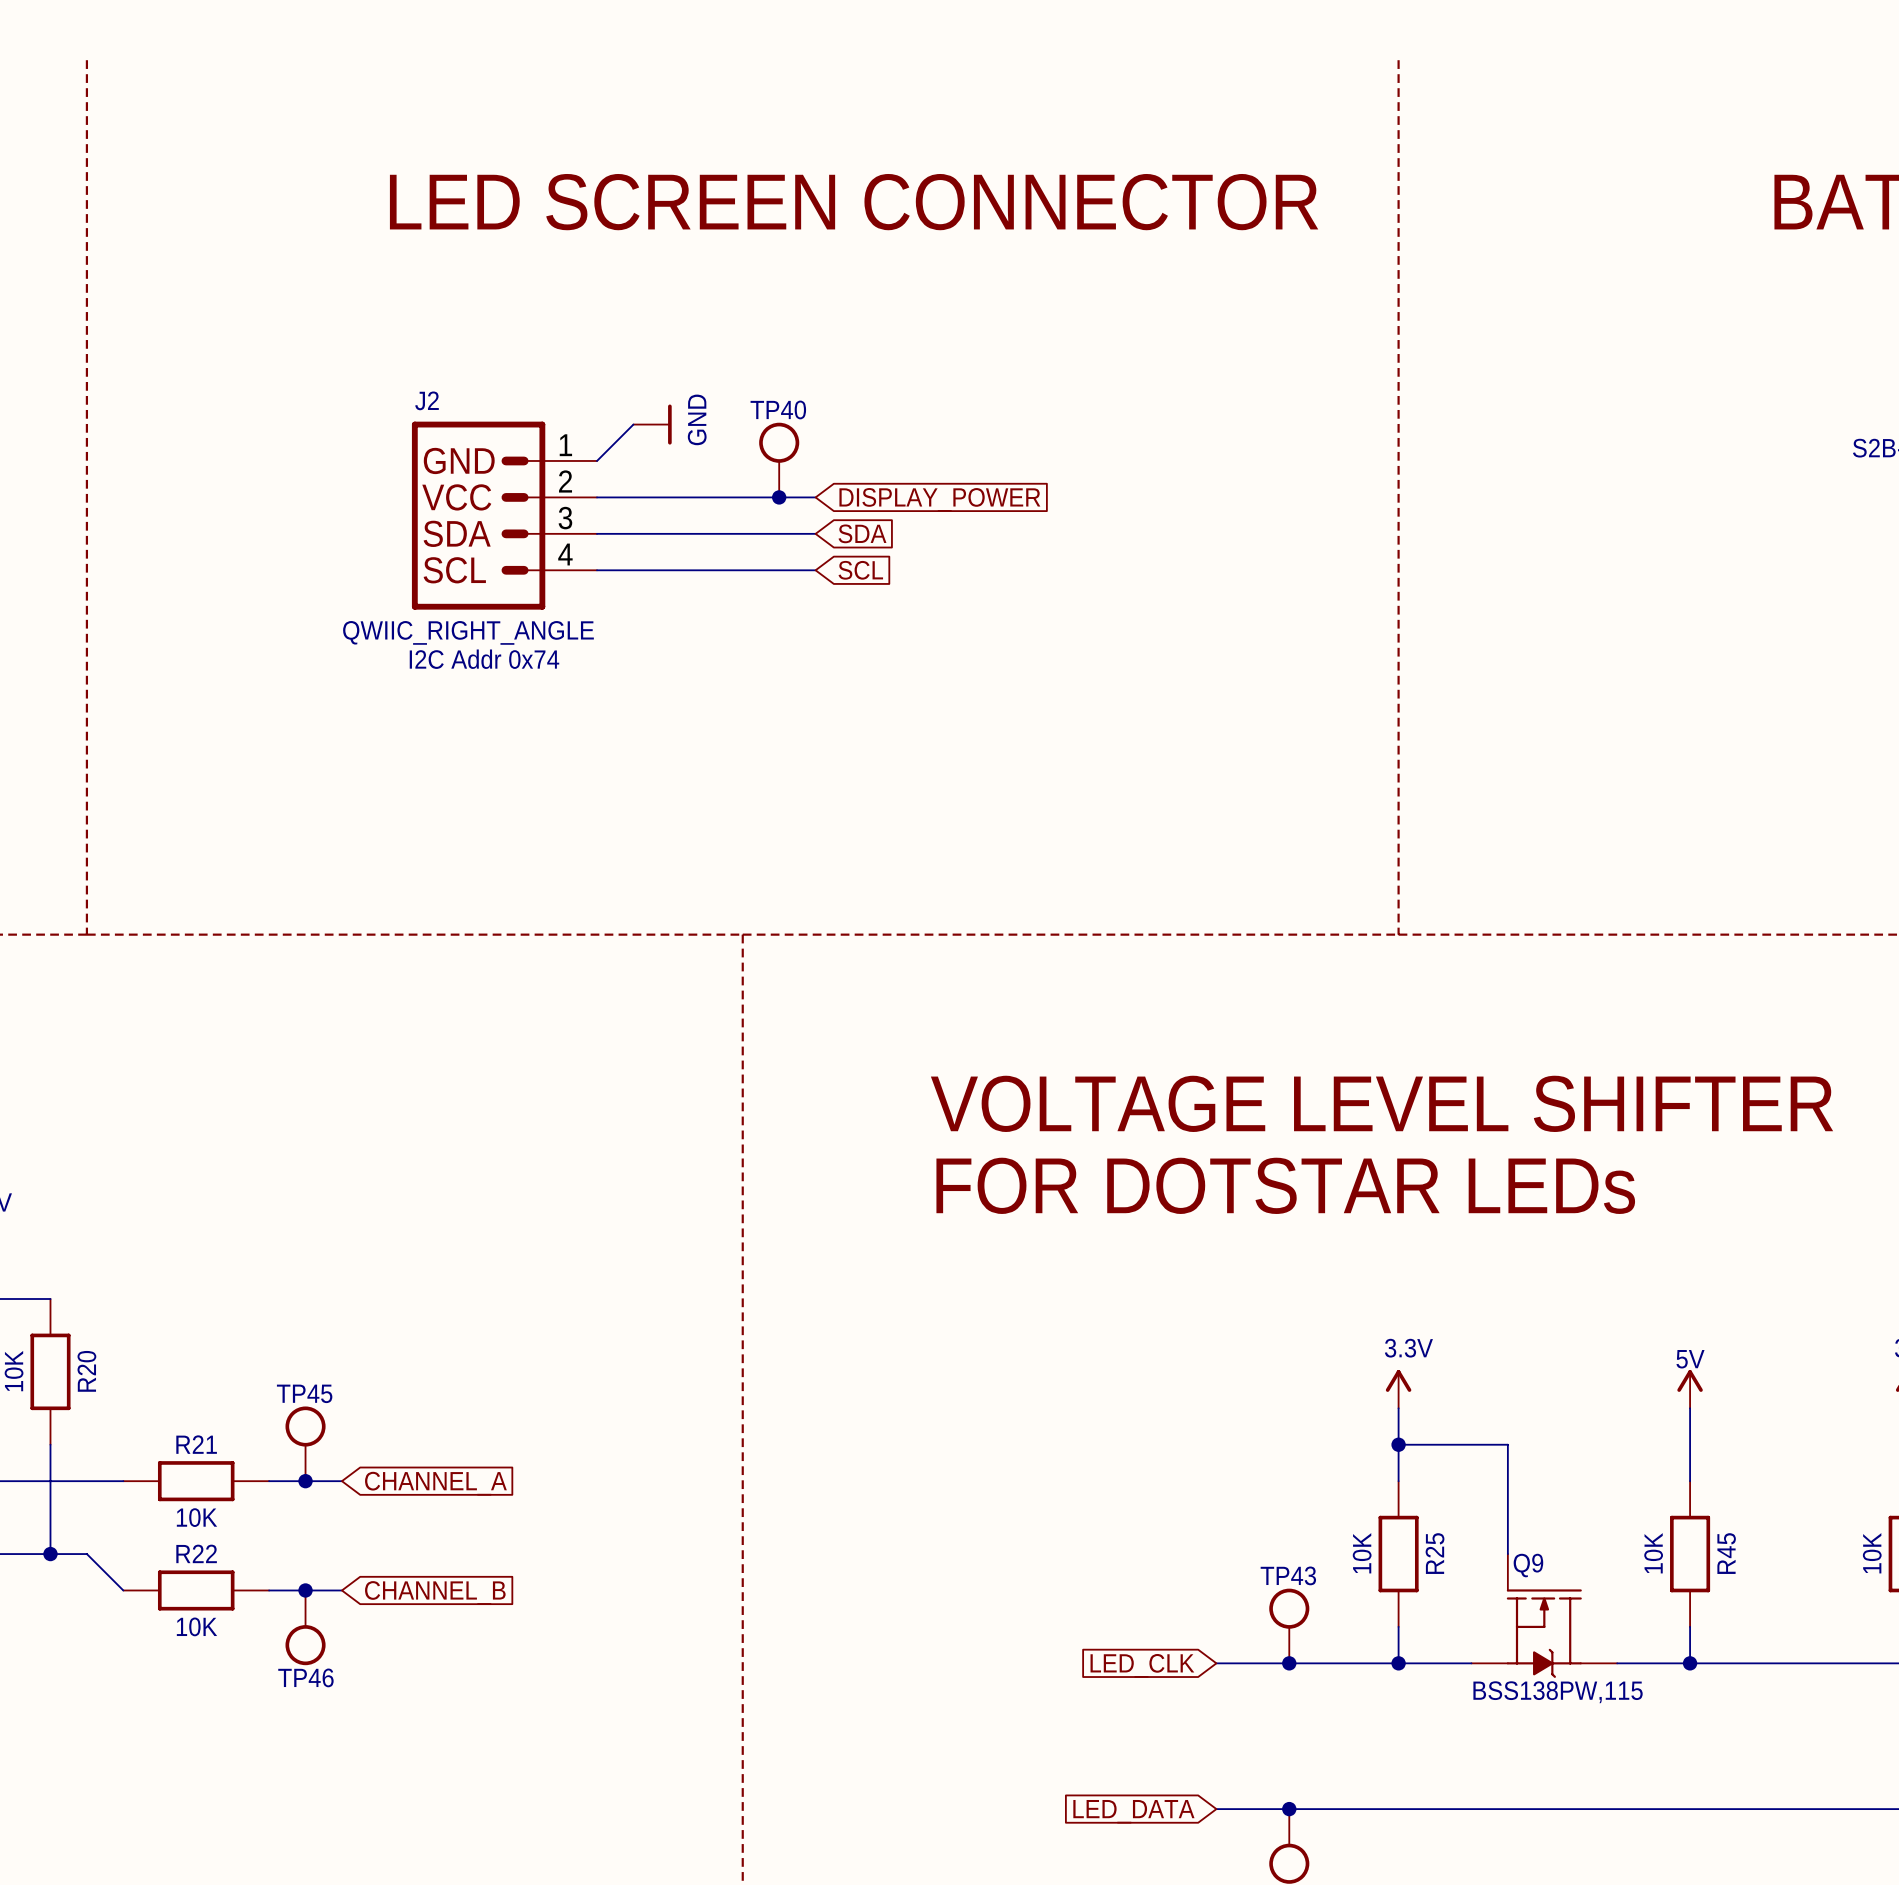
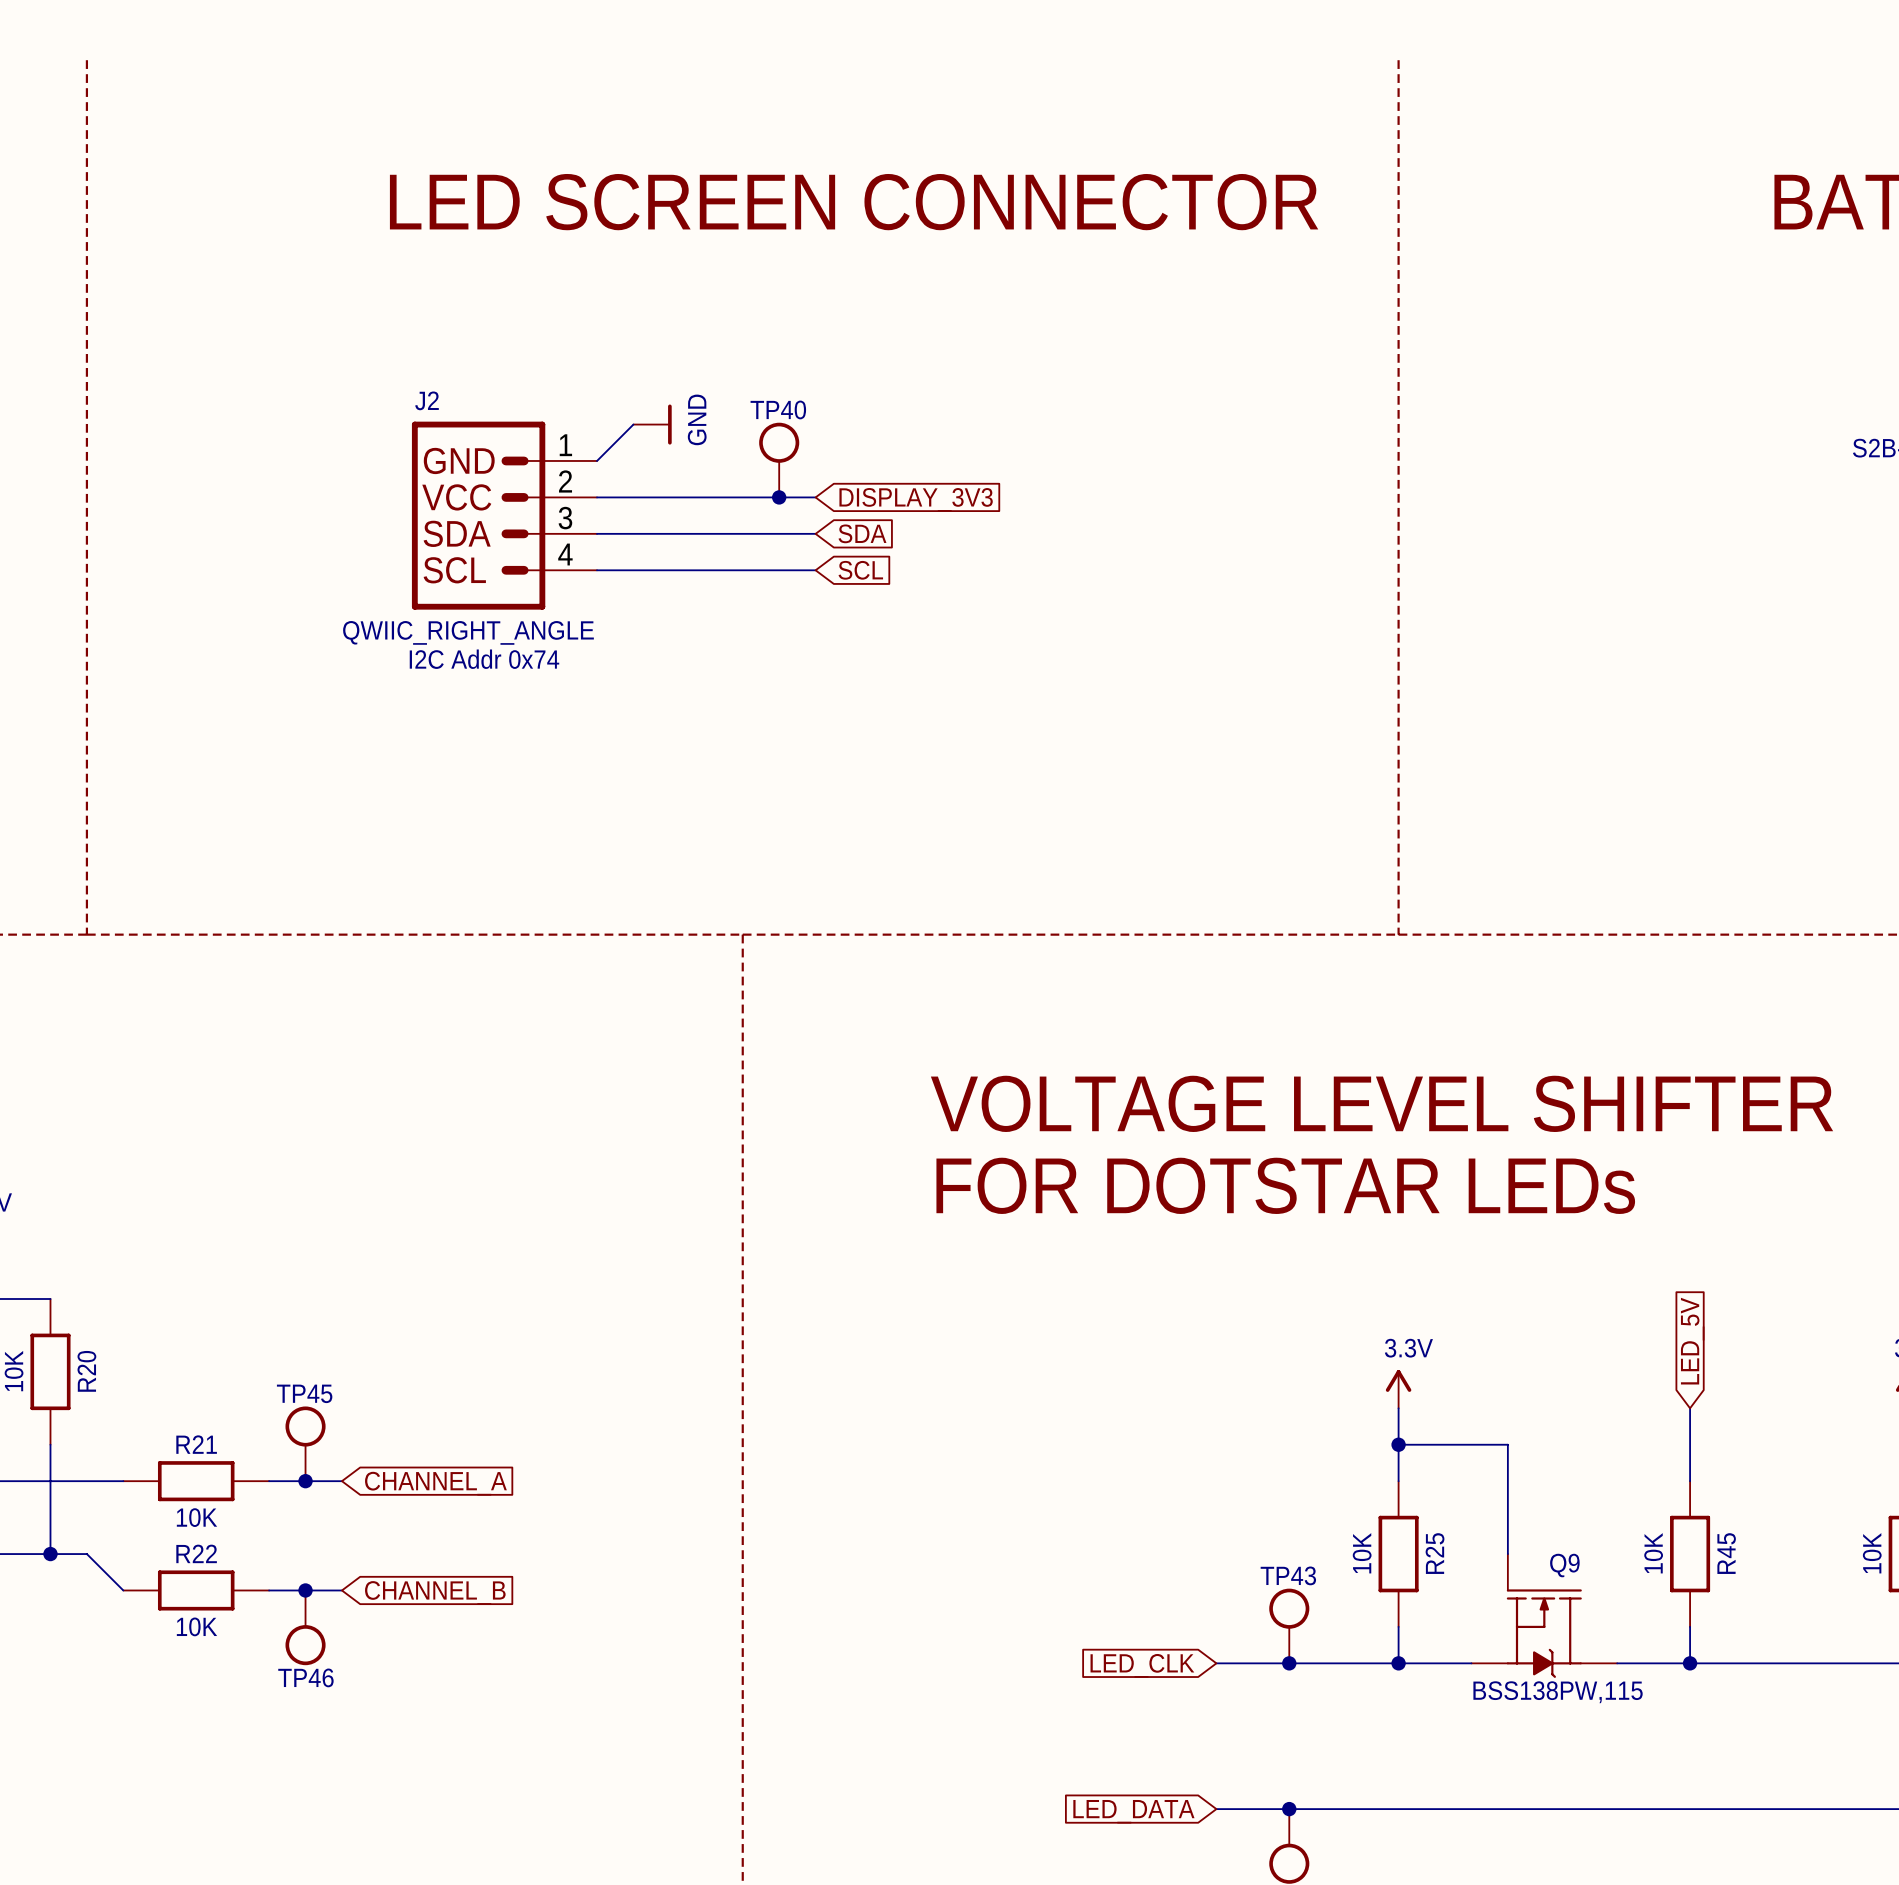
global label: DISPLAY_POWER (939, 499) -> DISPLAY_3V3 (916, 499)
global label: none -> LED_5V (1692, 1341)
power symbol: 5V (1690, 1389) -> none
Q9 name position: Q9 (1528, 1565) -> Q9 (1564, 1565)

